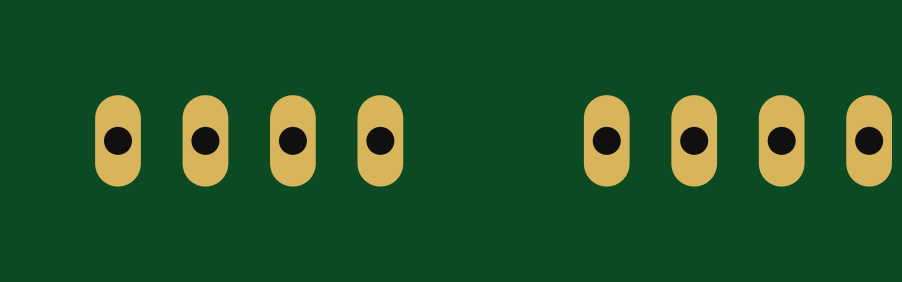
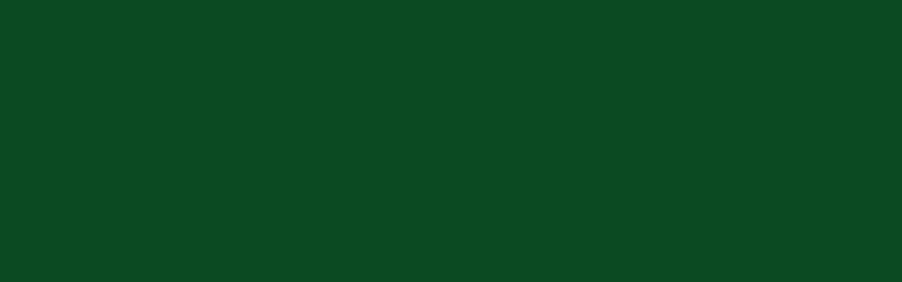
part: (249, 140) -> none
part: (737, 140) -> none

